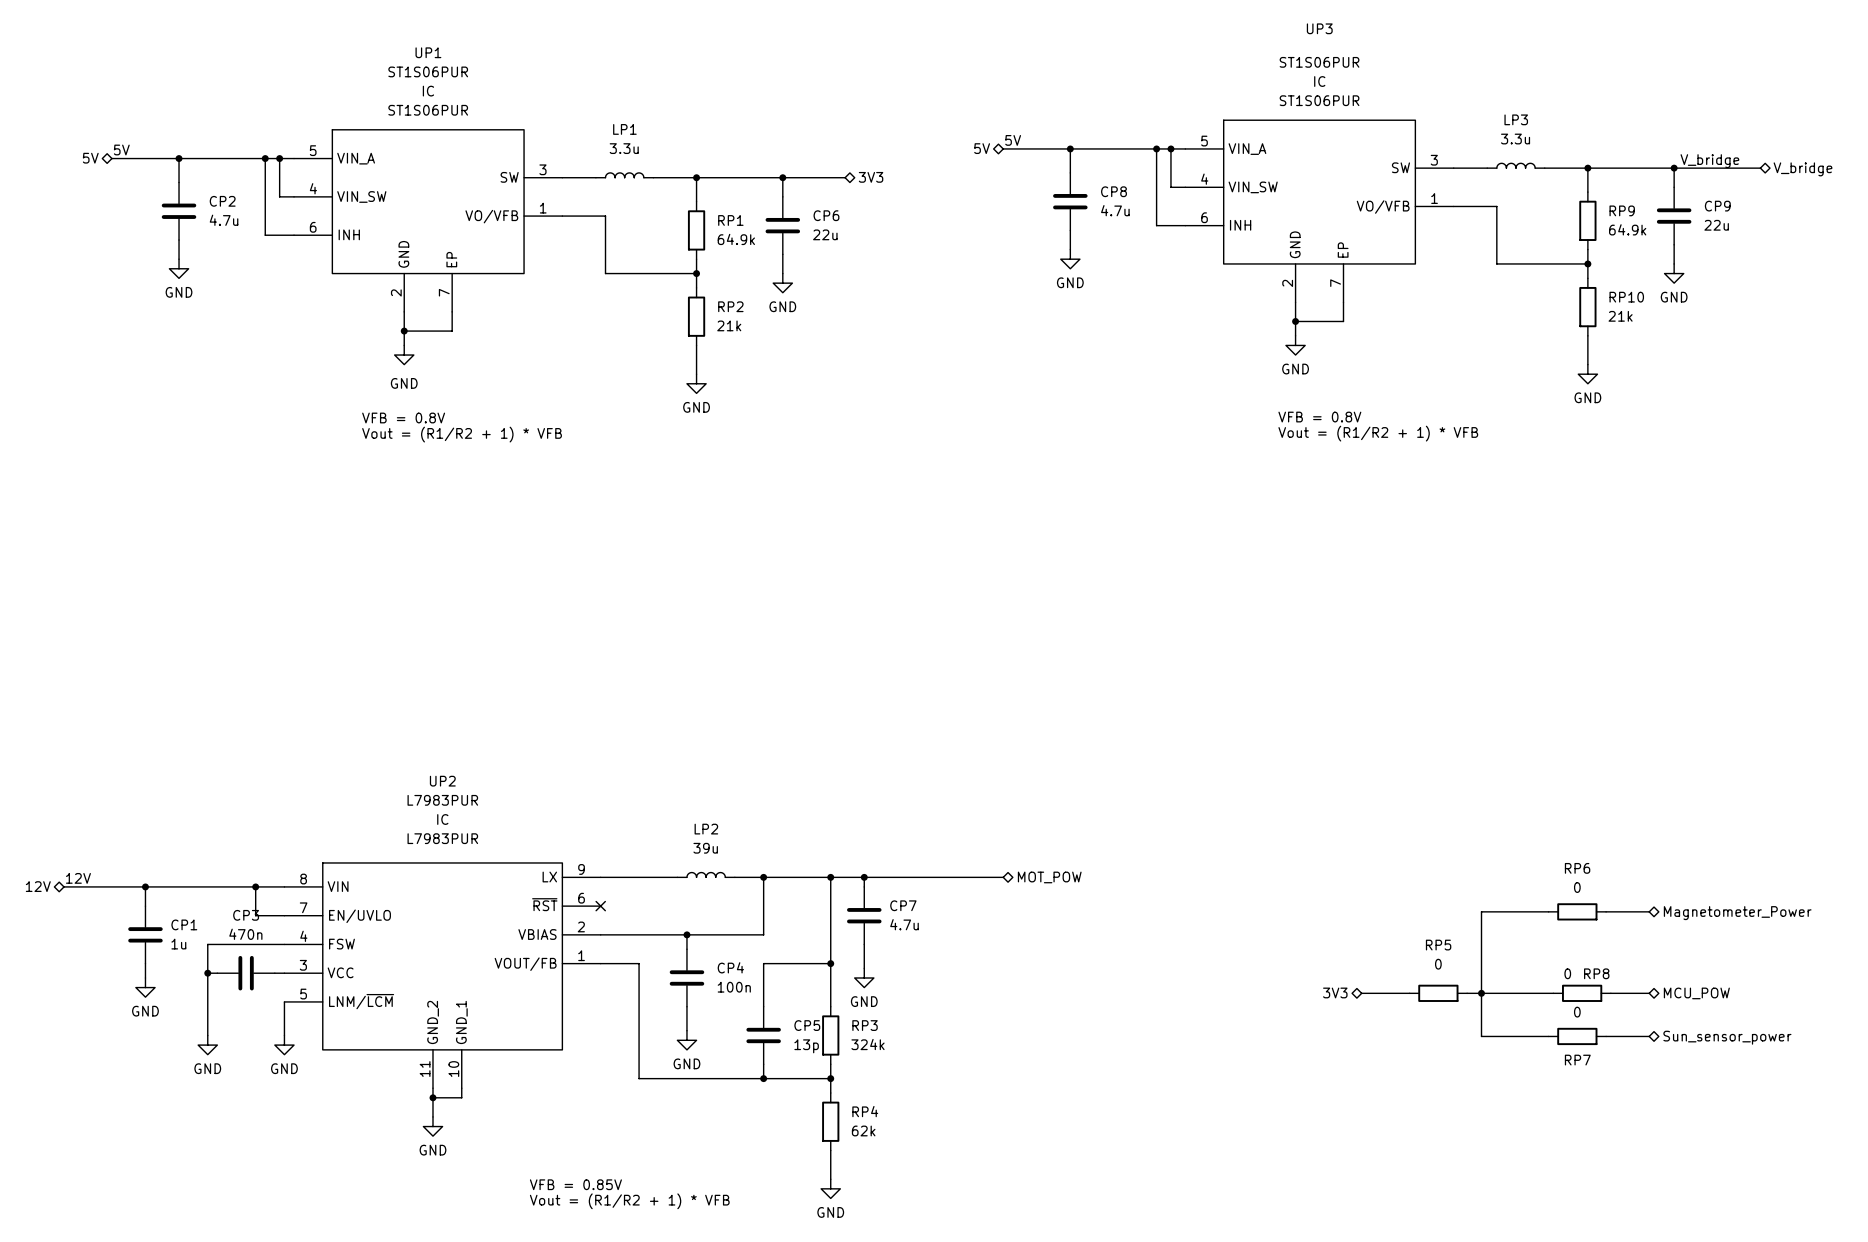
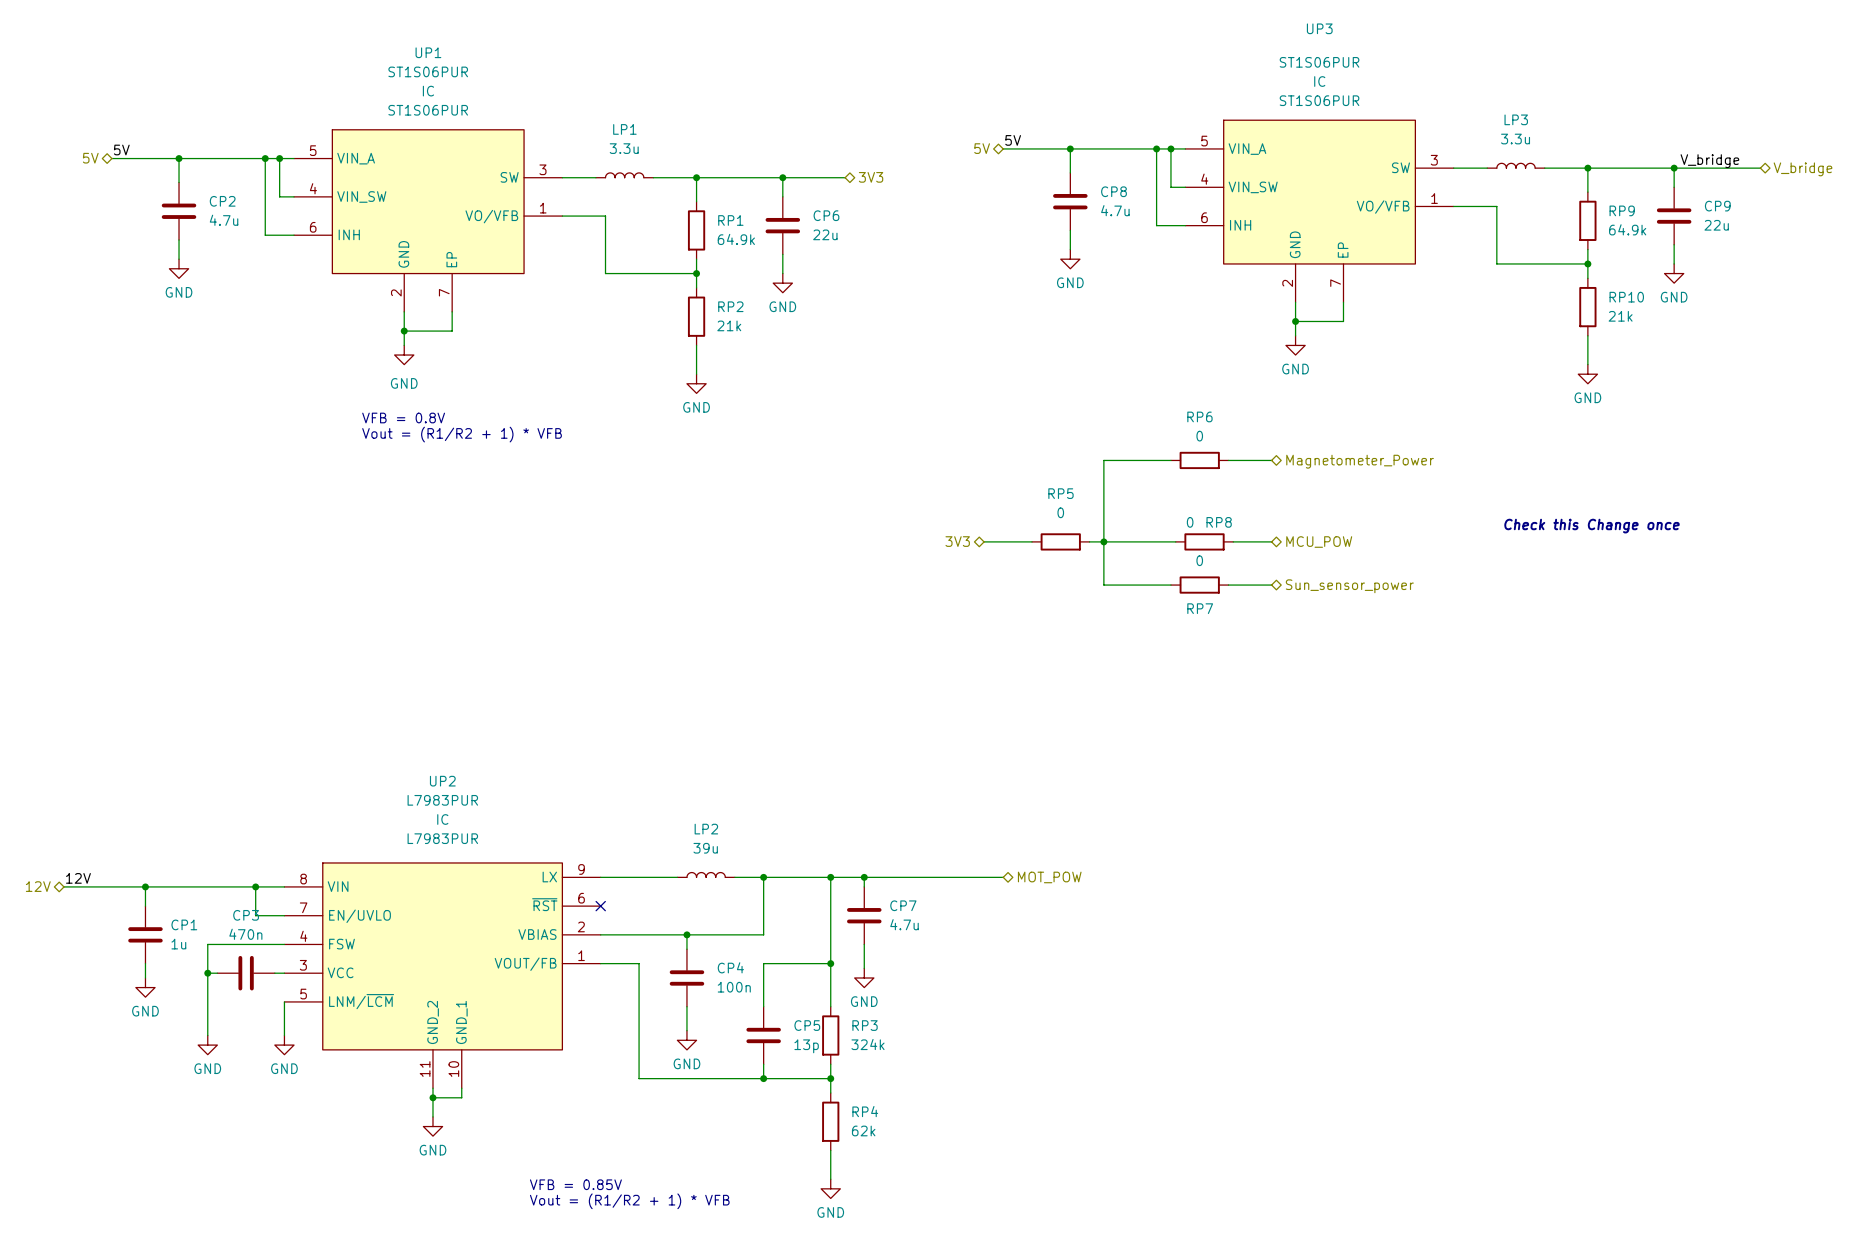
text: VFB = 0.8V (1319, 417) -> none
text: Vout = (R1/R2 + 1) * VFB (1378, 433) -> none
wire: none -> (1170, 460) (1103, 460) (1103, 585) (1170, 585)
wire: none -> (1228, 460) (1271, 460)
hierarchical label: none -> Magnetometer_Power (1360, 461)
text: none -> Check this Change once (1592, 526)
hierarchical label: none -> 3V3 (957, 541)
wire: none -> (984, 541) (1032, 541)
wire: none -> (1089, 541) (1175, 541)
junction: none -> (1103, 541)
wire: none -> (1233, 541) (1271, 541)
hierarchical label: none -> MCU_POW (1319, 542)
wire: none -> (1228, 585) (1271, 585)
hierarchical label: none -> Sun_sensor_power (1349, 586)
wire: (1548, 911) (1481, 911) (1481, 1036) (1548, 1036) -> none
RP6 position: (1577, 911) -> (1199, 460)
wire: (1606, 911) (1649, 911) -> none
hierarchical label: Magnetometer_Power (1737, 913) -> none
hierarchical label: 3V3 (1335, 992) -> none
wire: (1361, 993) (1409, 993) -> none
RP5 position: (1438, 993) -> (1060, 541)
wire: (1467, 993) (1553, 993) -> none
junction: (1481, 993) -> none
RP8 position: (1582, 993) -> (1204, 541)
wire: (1610, 993) (1649, 993) -> none
hierarchical label: MCU_POW (1696, 993) -> none
RP7 position: (1577, 1036) -> (1199, 585)
wire: (1606, 1036) (1649, 1036) -> none
hierarchical label: Sun_sensor_power (1727, 1037) -> none

